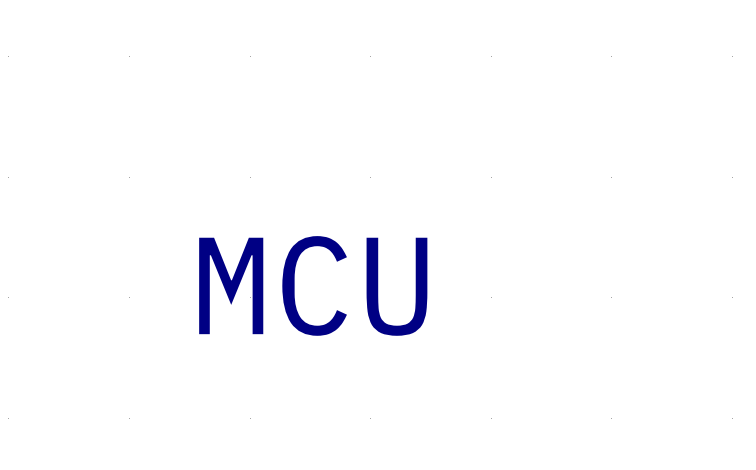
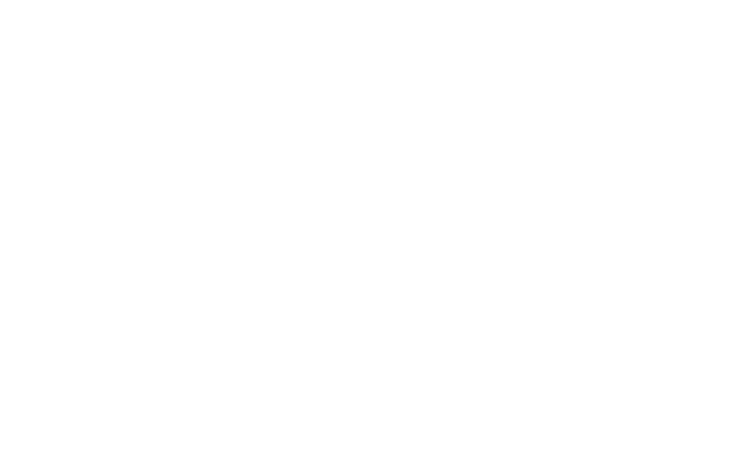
text: MCU (313, 285) -> none

